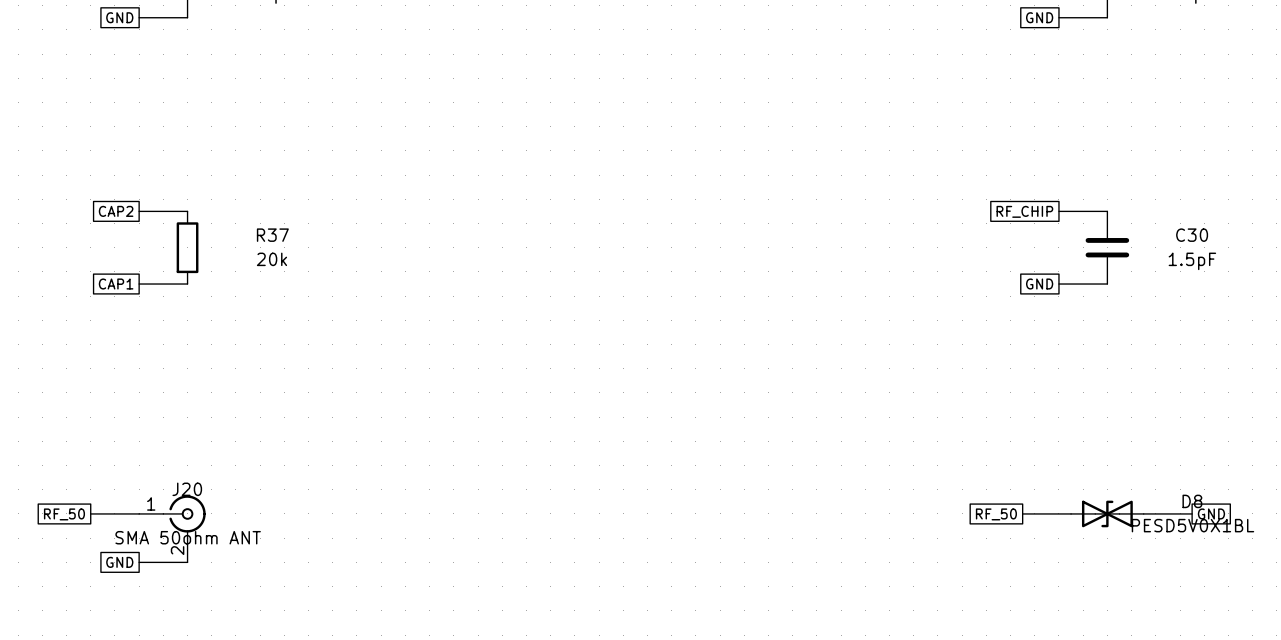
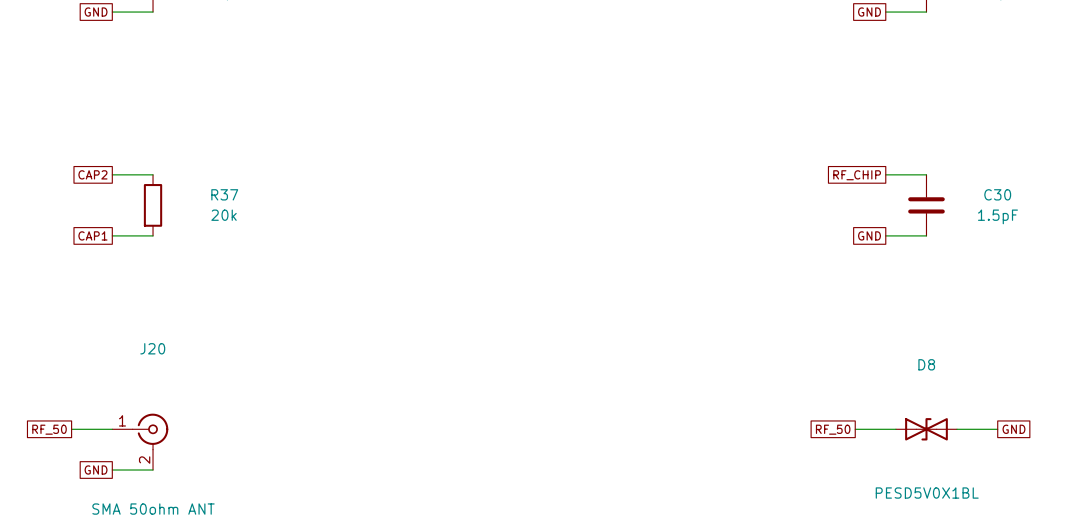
J20 name position: J20 (187, 489) -> J20 (152, 348)
D8 name position: D8 (1192, 501) -> D8 (926, 364)
D8 value position: PESD5V0X1BL (1192, 525) -> PESD5V0X1BL (927, 493)
J20 value position: SMA 50ohm ANT (188, 537) -> SMA 50ohm ANT (153, 509)

